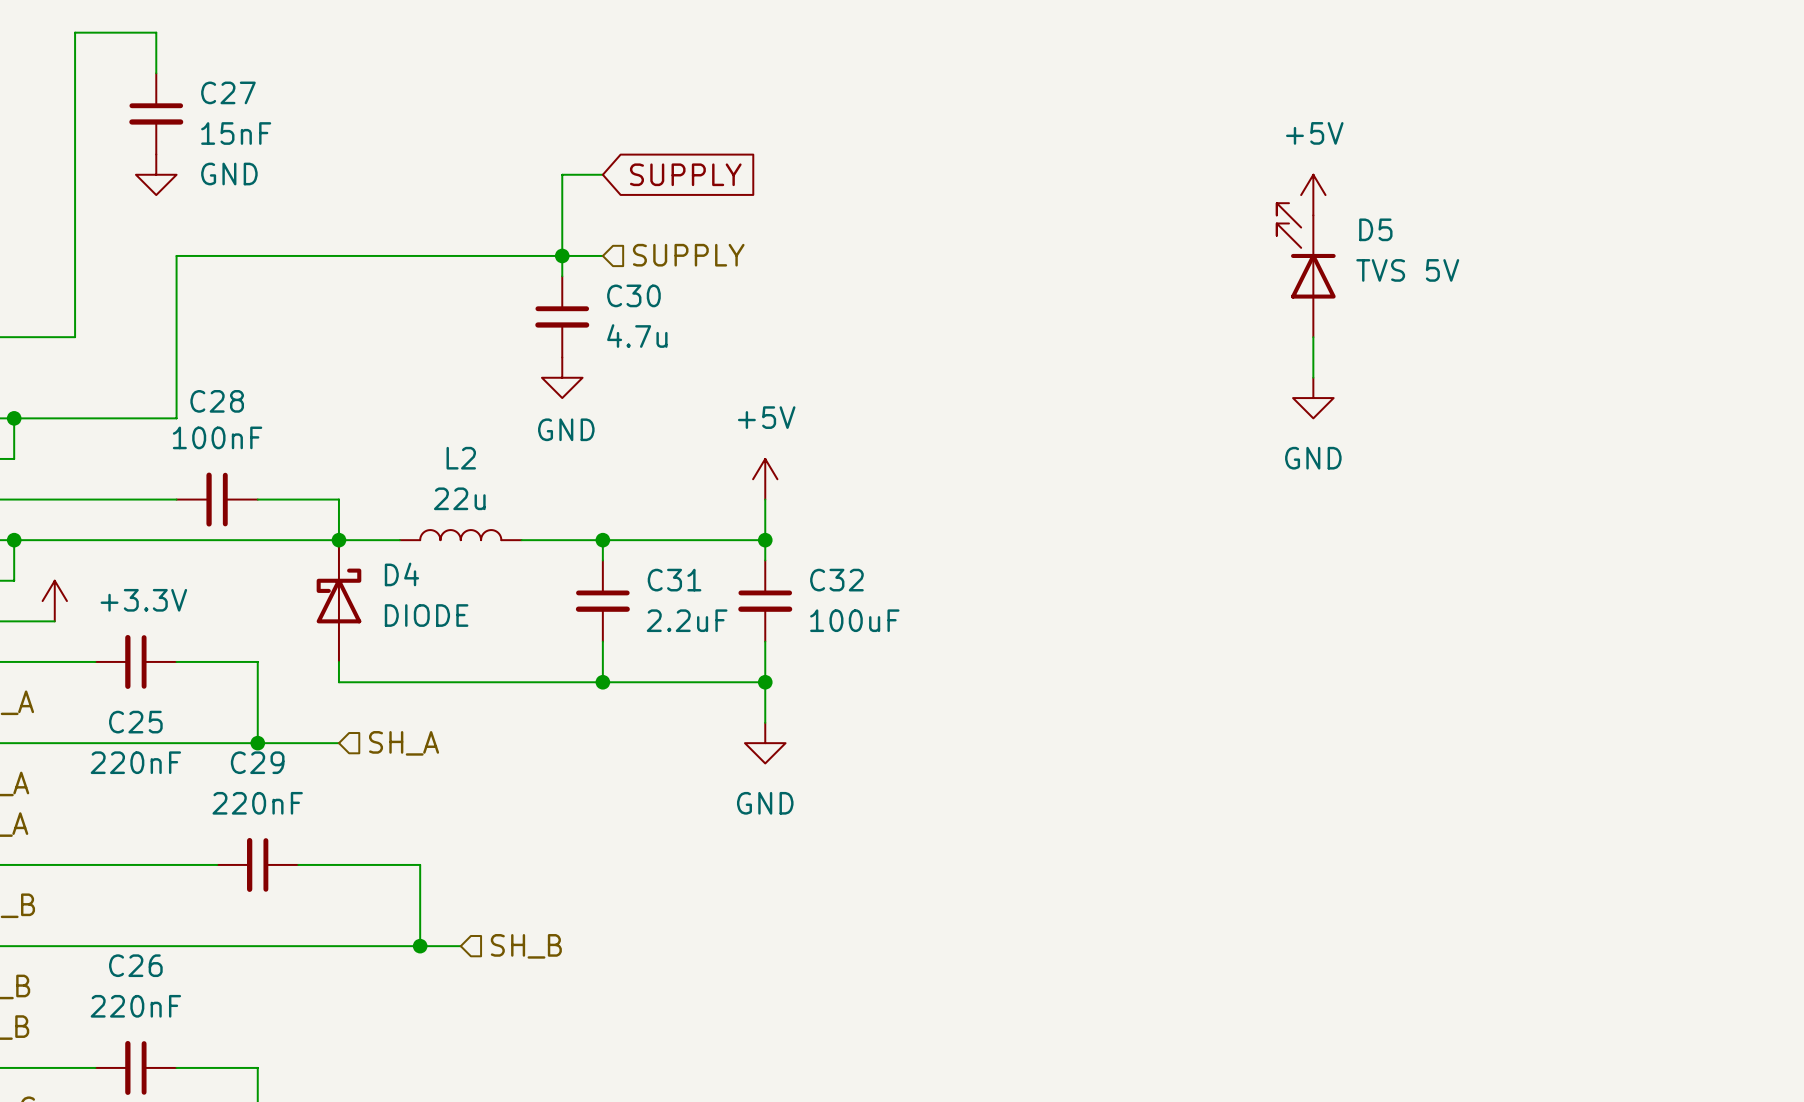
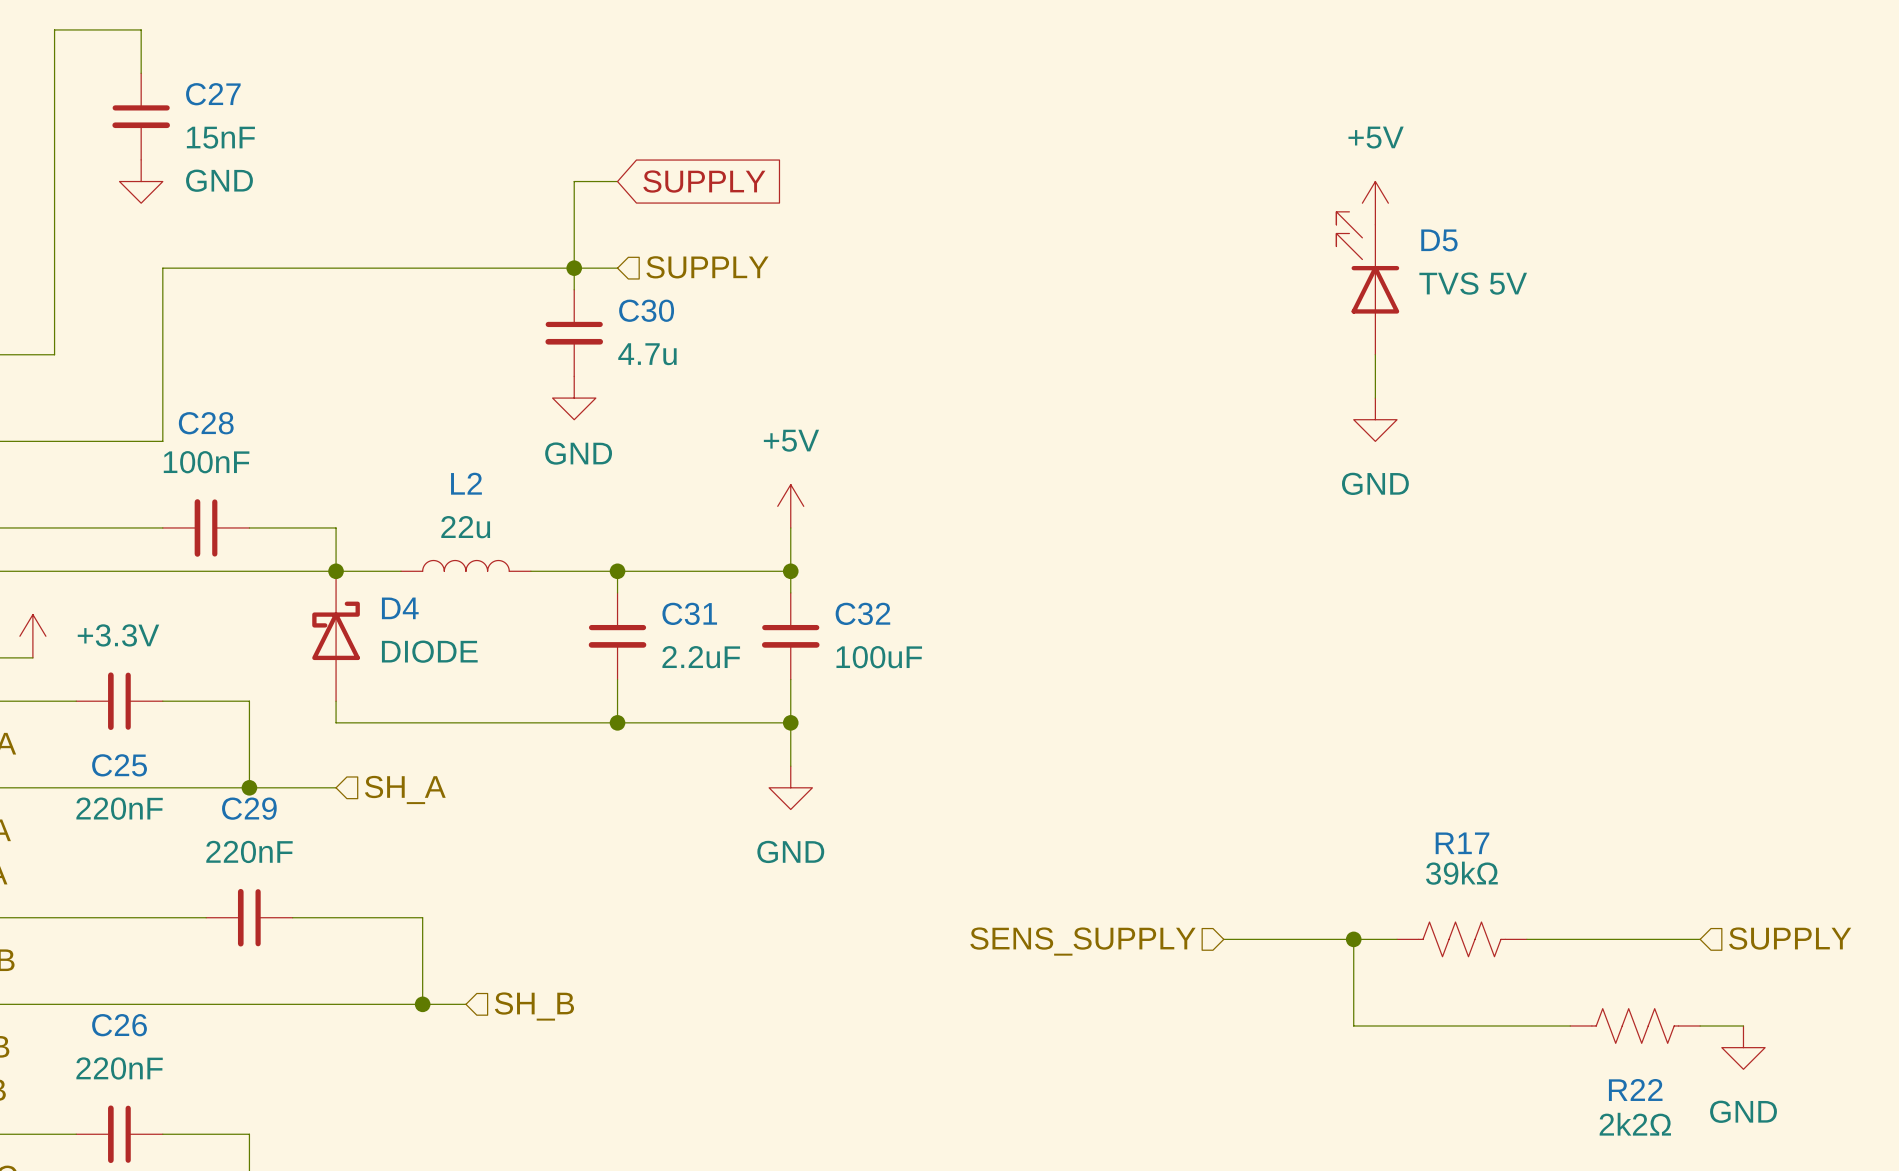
hierarchical label: none -> SUPPLY (1790, 938)
hierarchical label: none -> SENS_SUPPLY (1082, 941)
wire: none -> (1223, 939) (1397, 939)
wire: none -> (1353, 939) (1353, 1025) (1570, 1025)
junction: none -> (1353, 939)
R17: none -> 39kΩ (1461, 939)
wire: none -> (1526, 939) (1700, 939)
R22: none -> 2k2Ω (1635, 1025)
wire: none -> (1700, 1025) (1743, 1025)
power symbol: none -> GND (1743, 1047)

